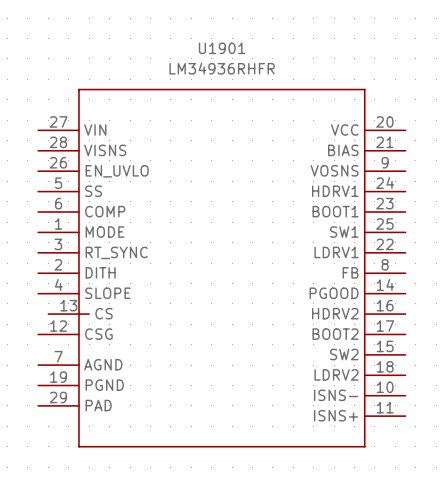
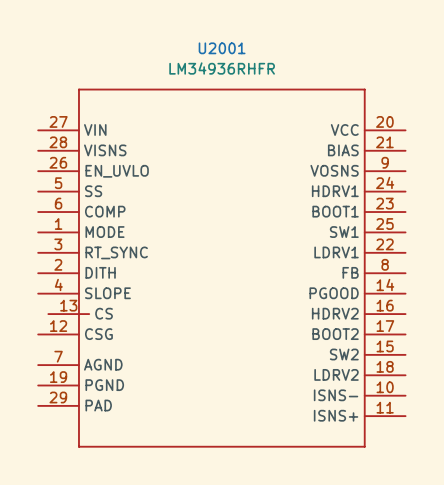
U1901 name: U1901 (222, 48) -> U2001 (222, 48)

